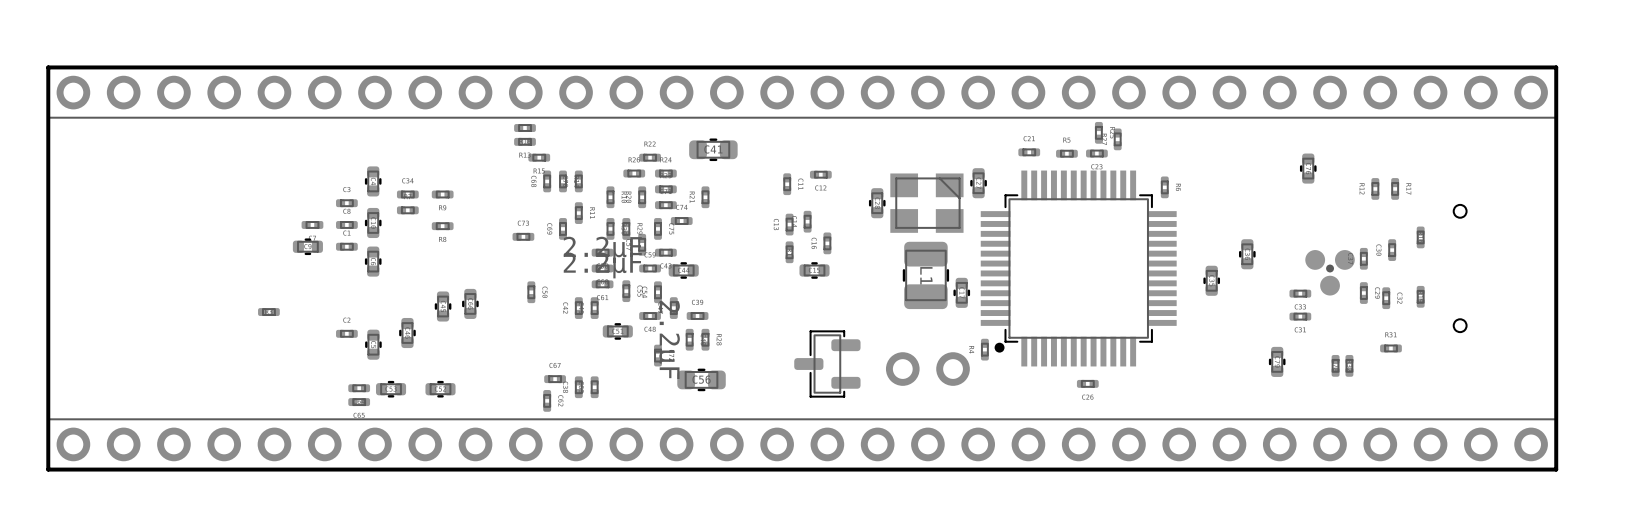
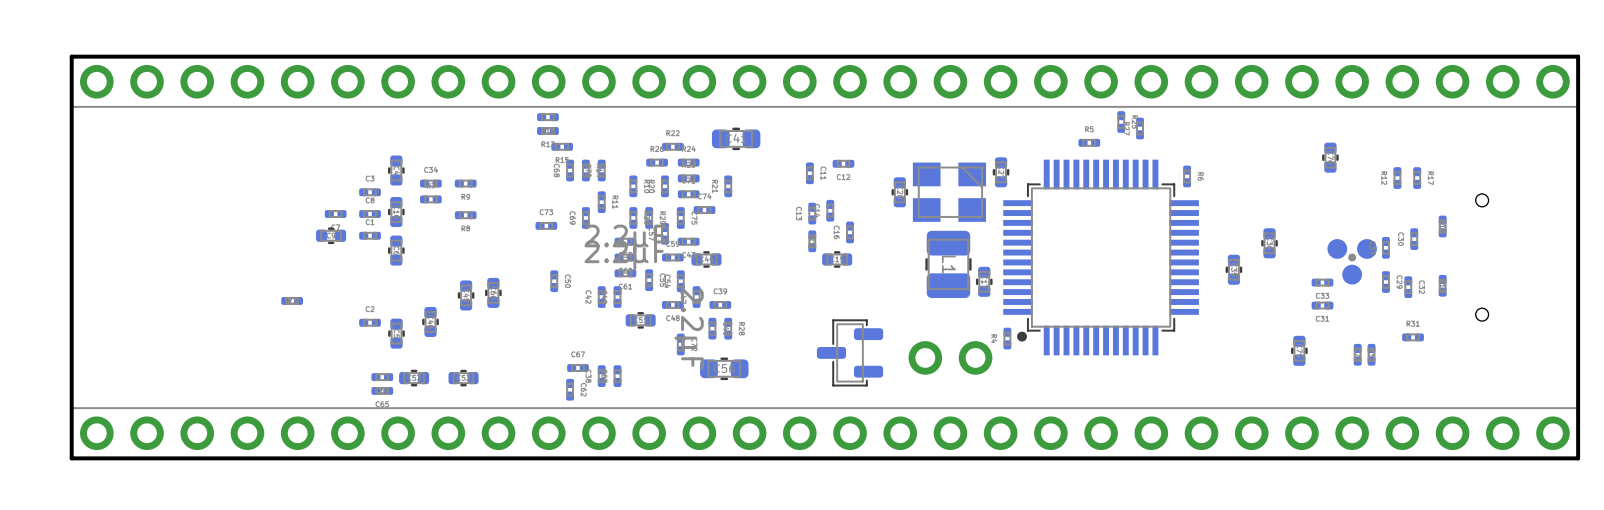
part: (1029, 152) -> none
part: (1096, 153) -> none
part: (1087, 383) -> none

